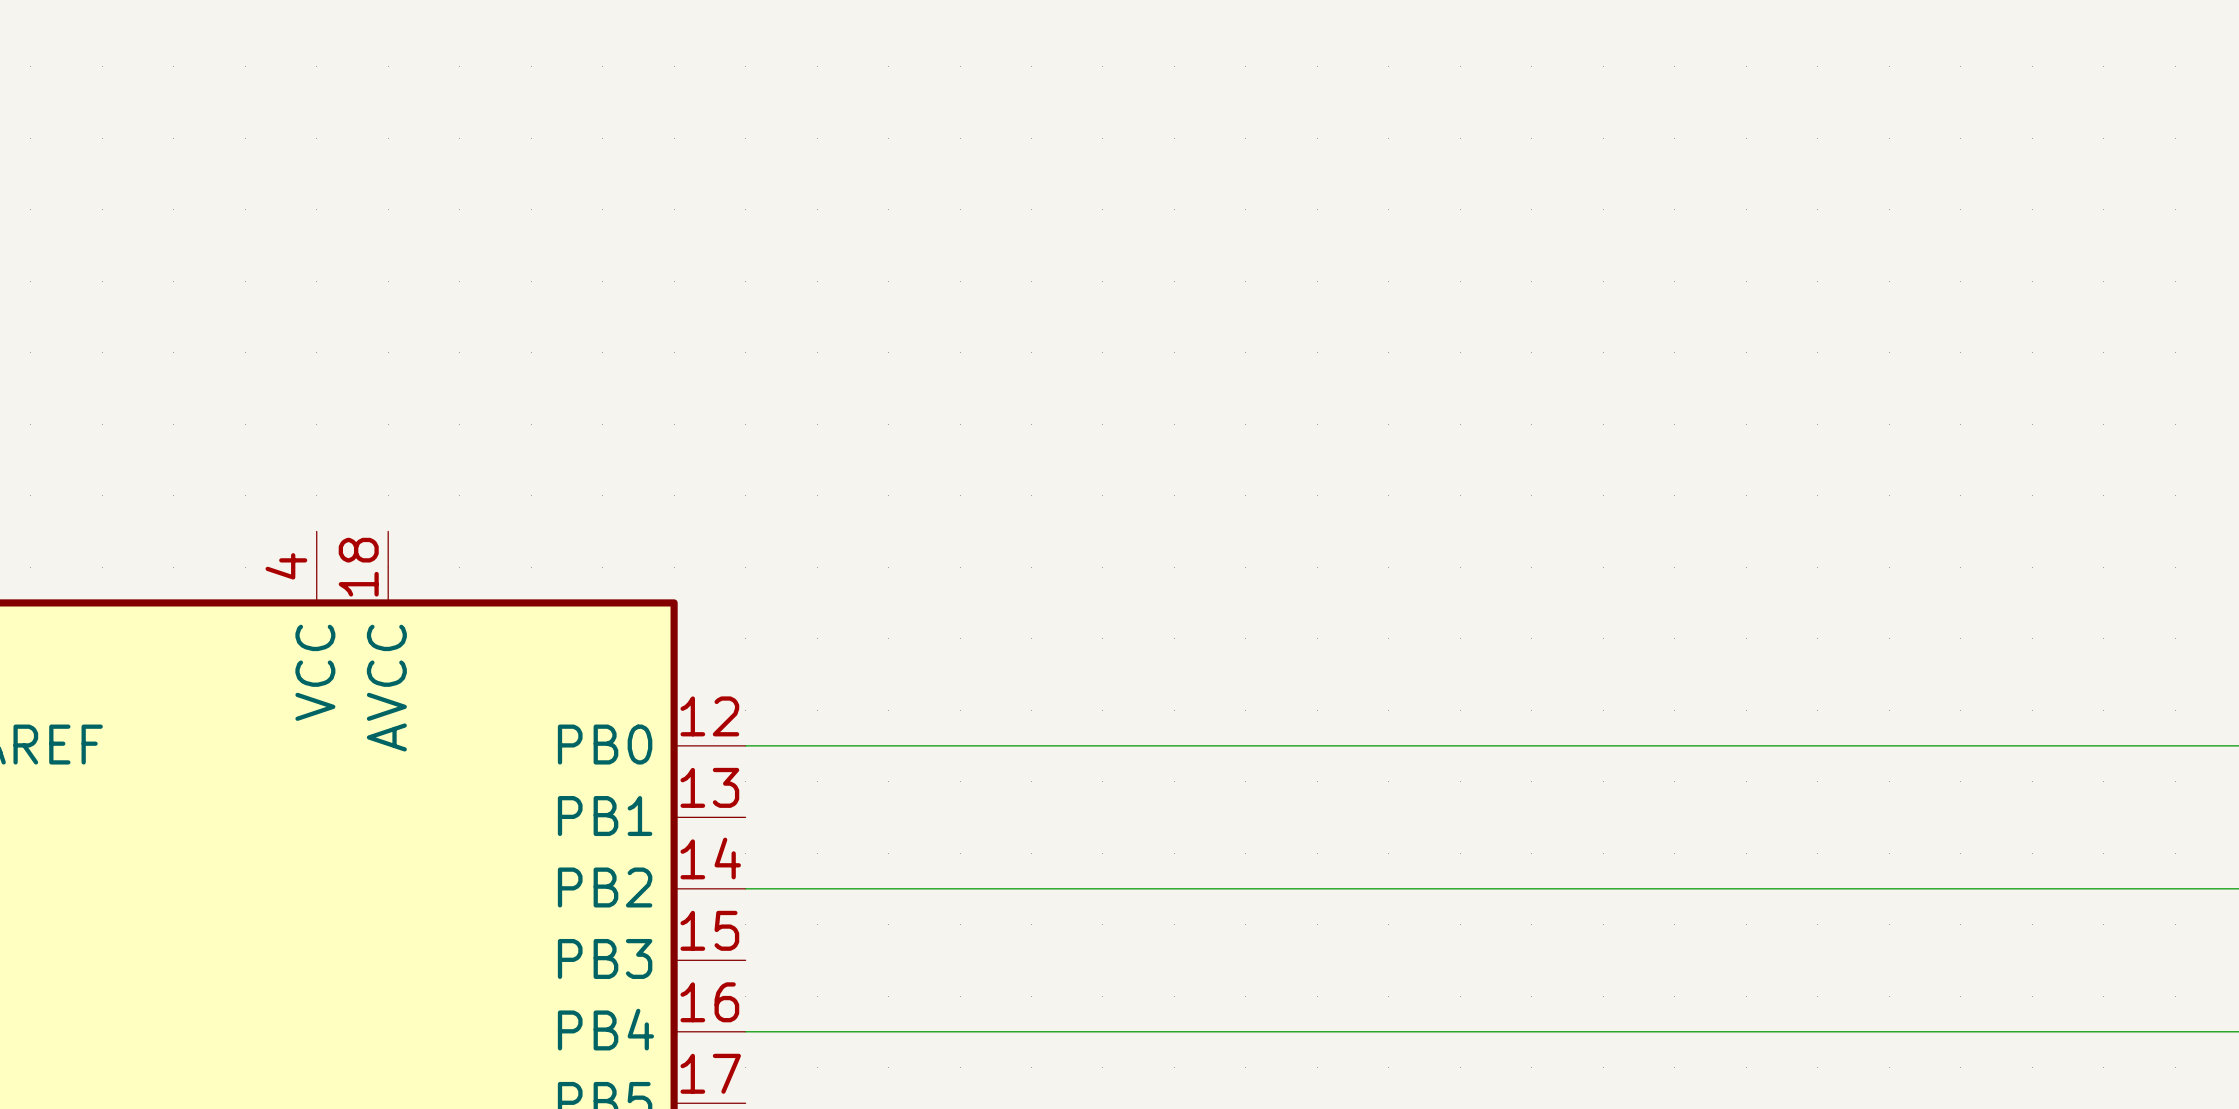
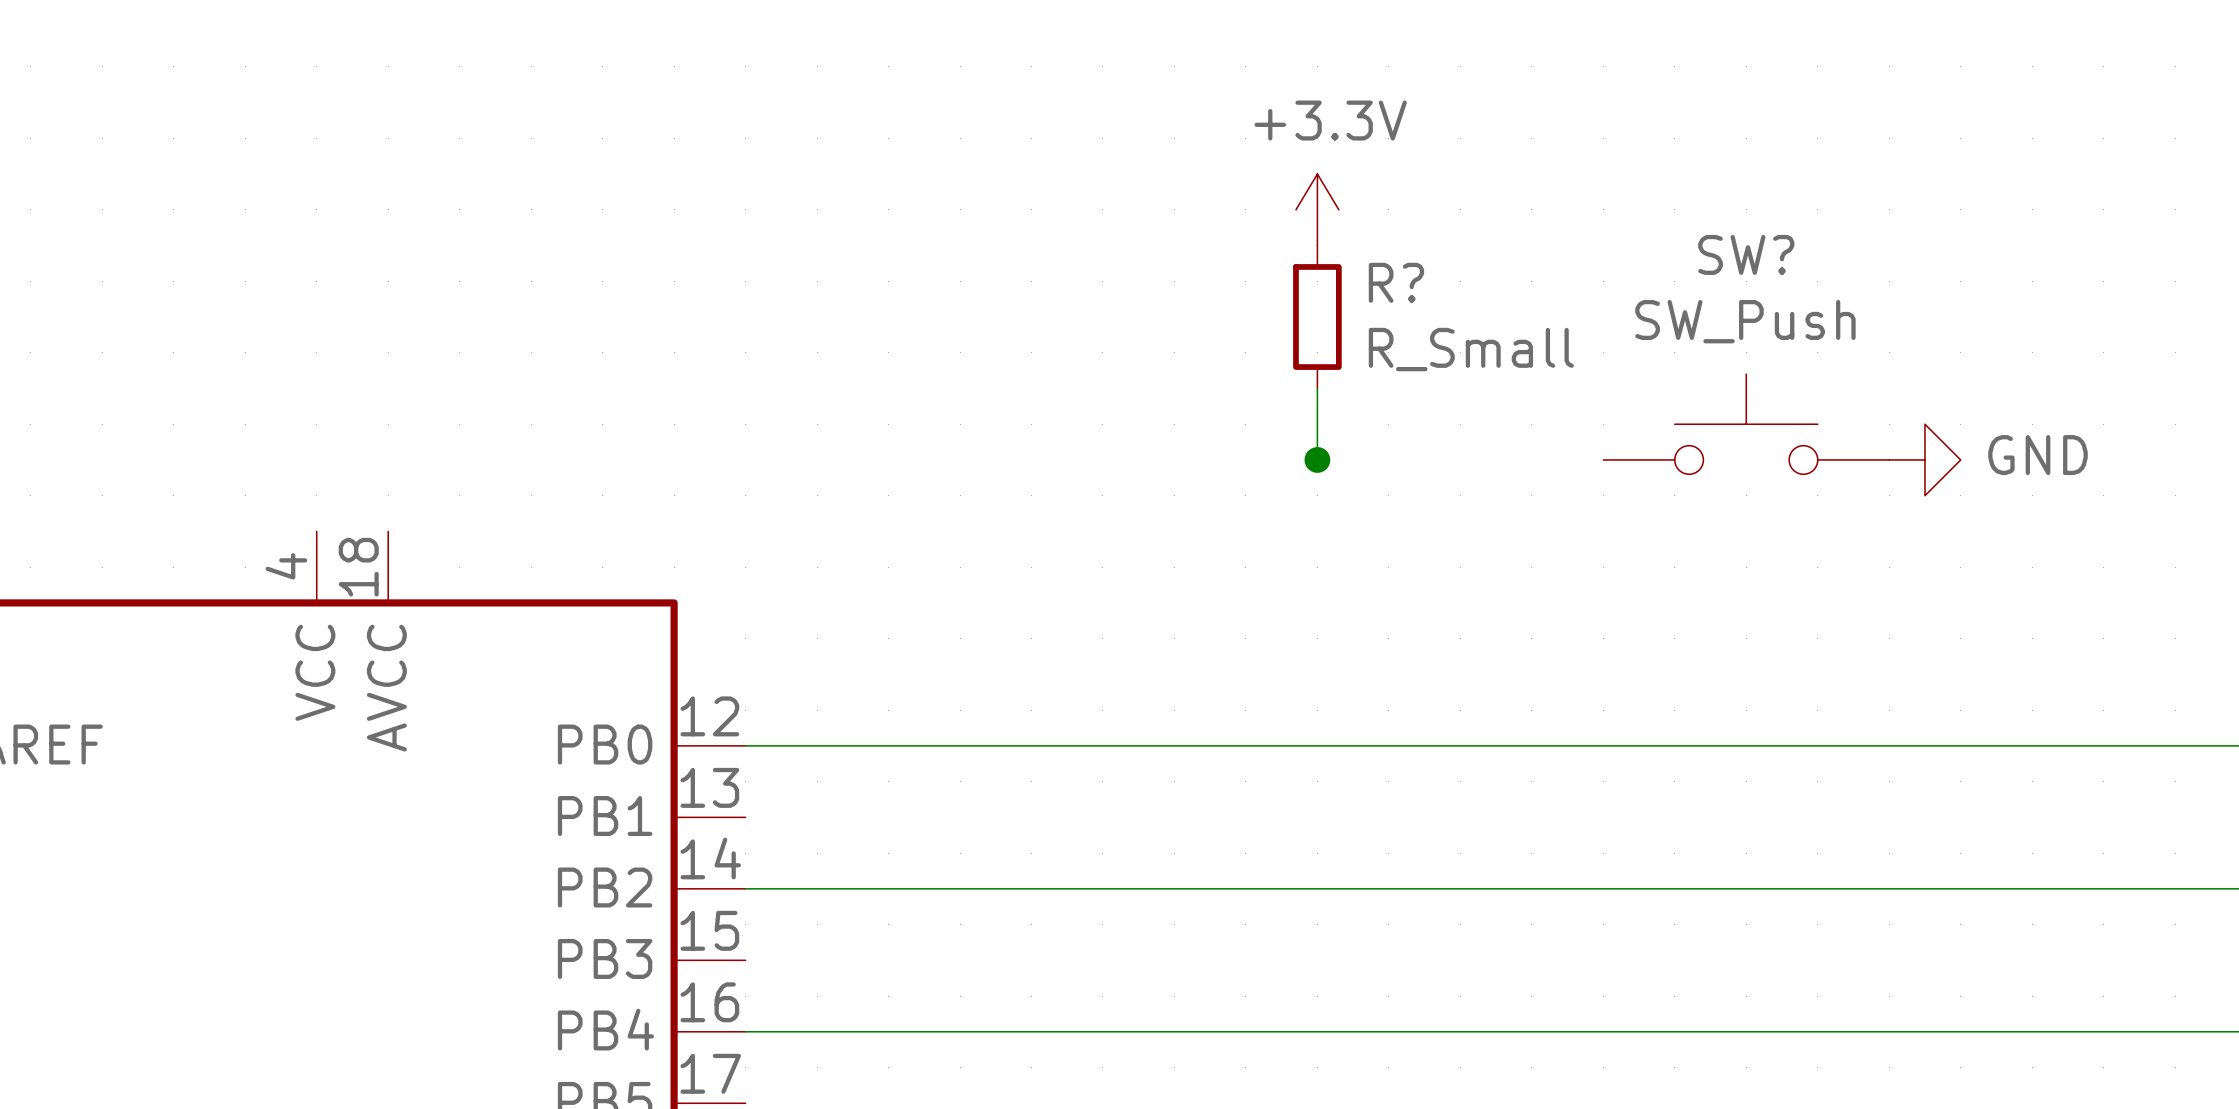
power symbol: none -> +3.3V (1317, 209)
R?: none -> R_Small (1317, 317)
wire: none -> (1317, 388) (1317, 459)
SW?: none -> SW_Push (1746, 424)
junction: none -> (1317, 459)
power symbol: none -> GND (1924, 459)

